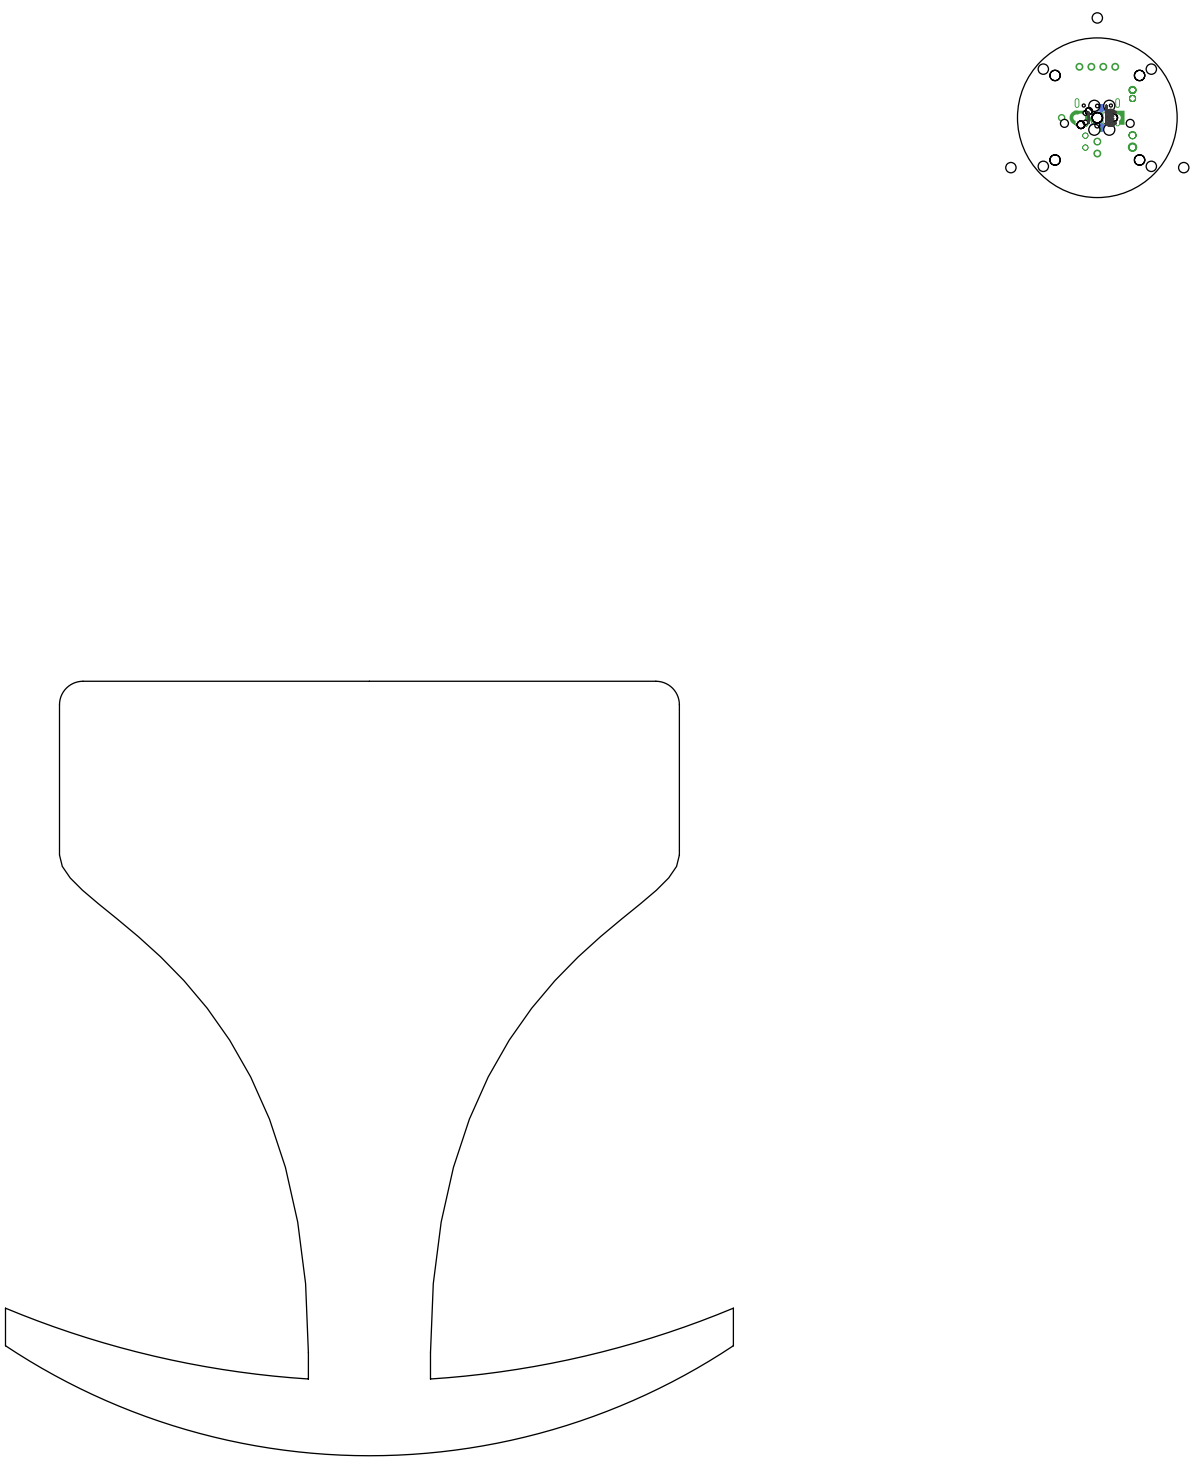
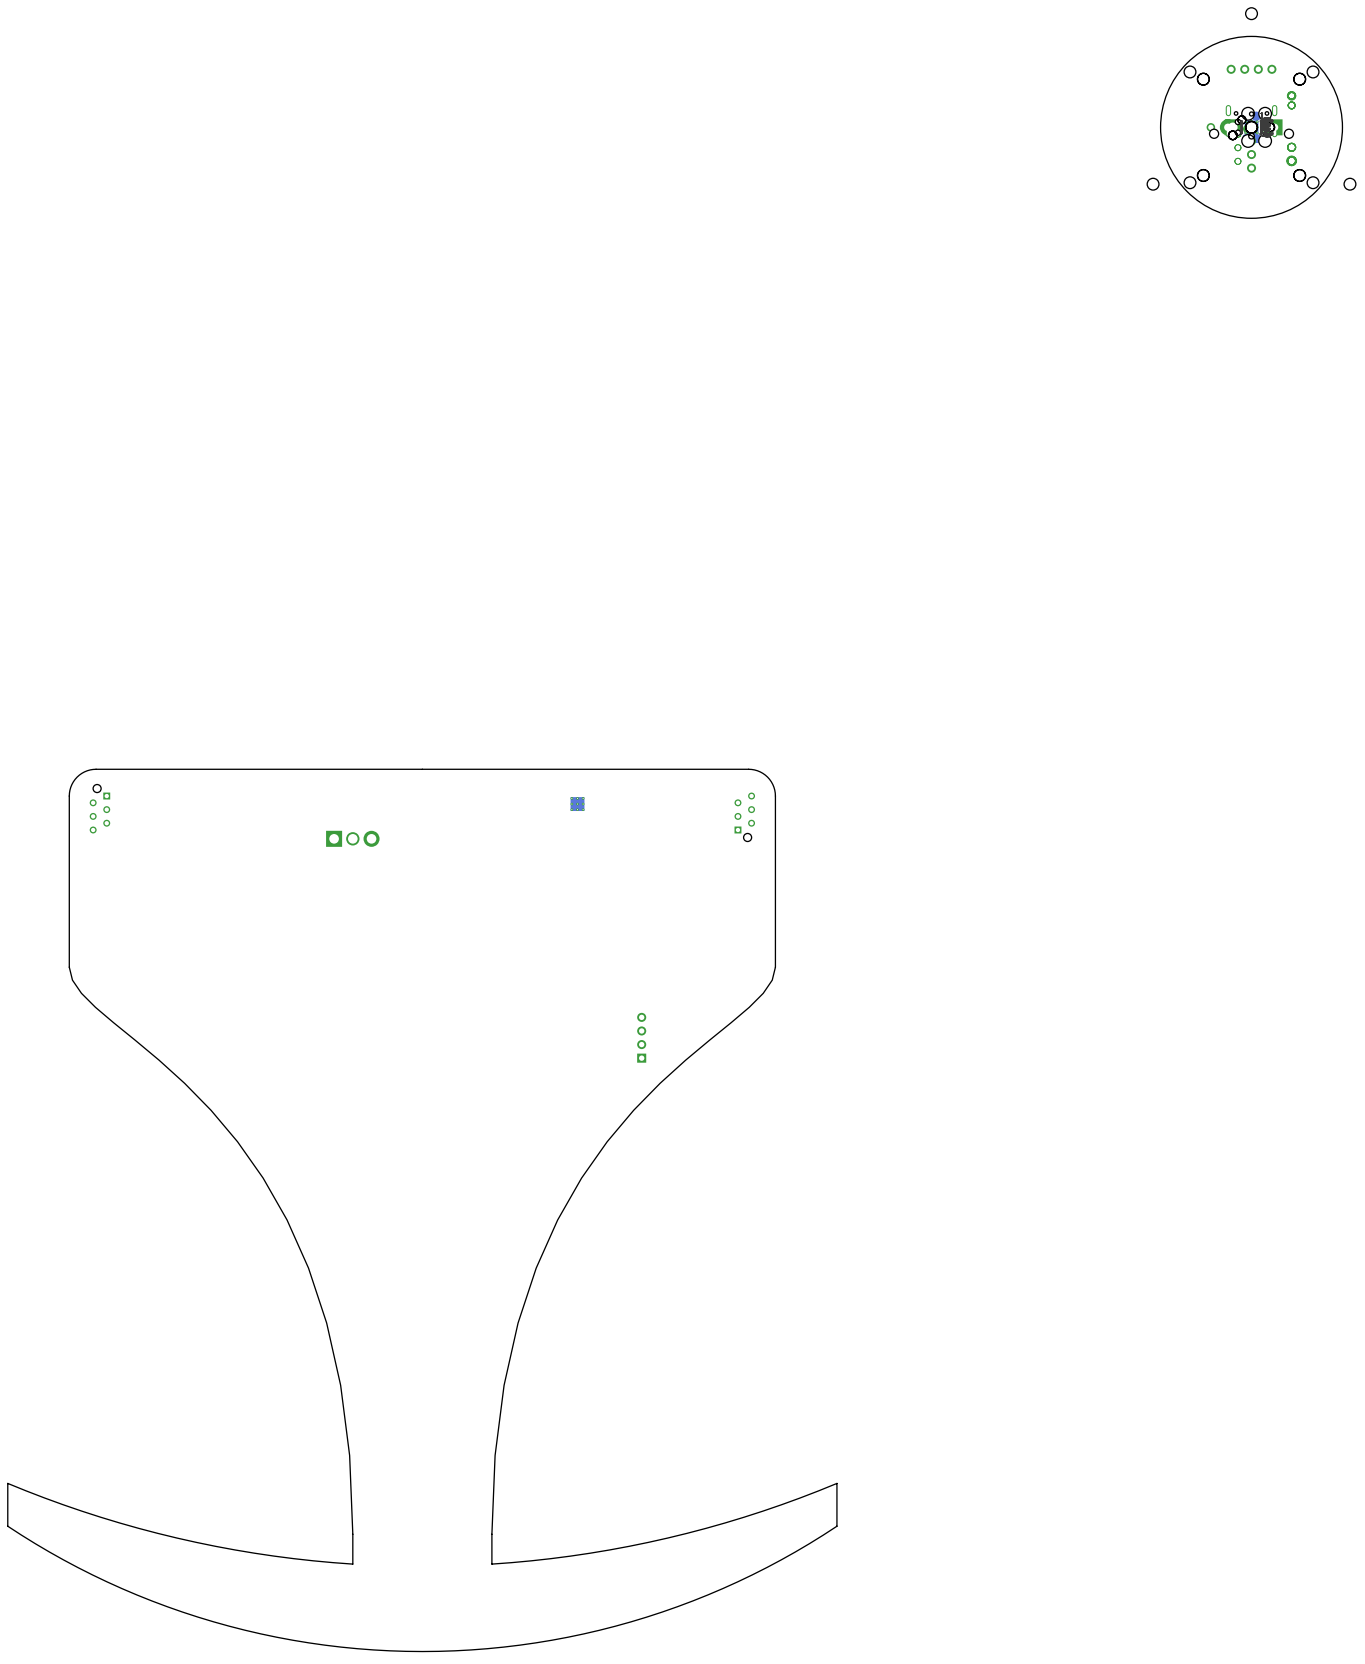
part: none -> (577, 804)
part: none -> (99, 809)
part: none -> (744, 817)
part: none -> (352, 838)
part: none -> (641, 1037)

